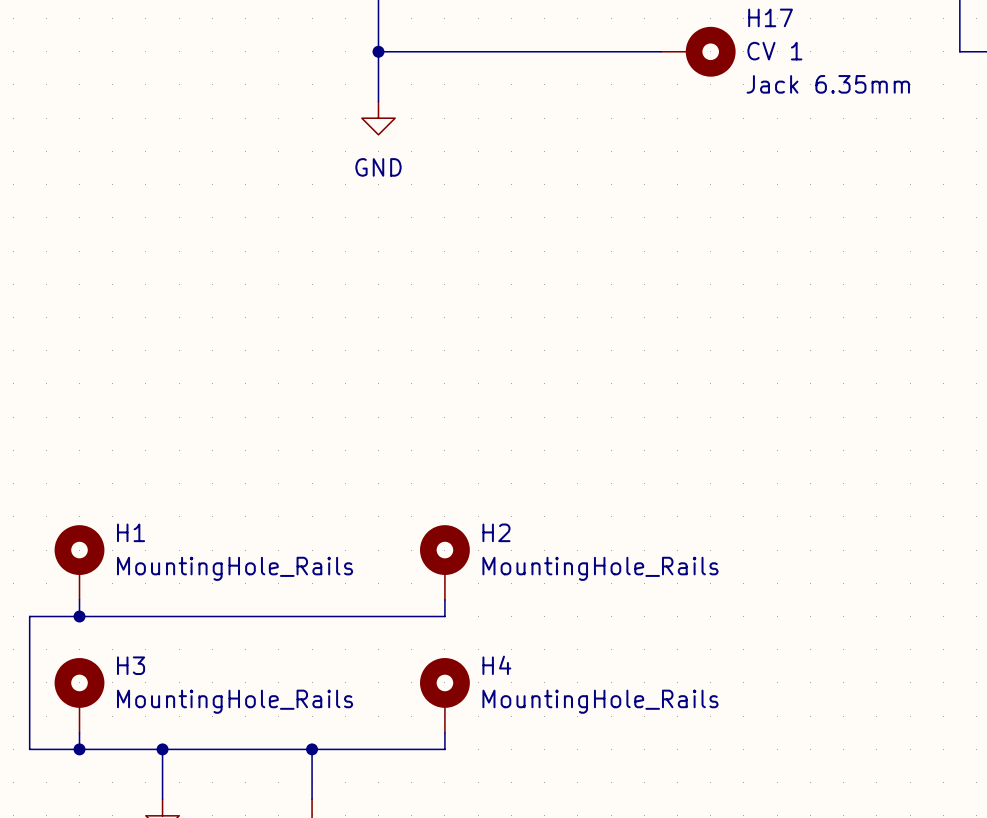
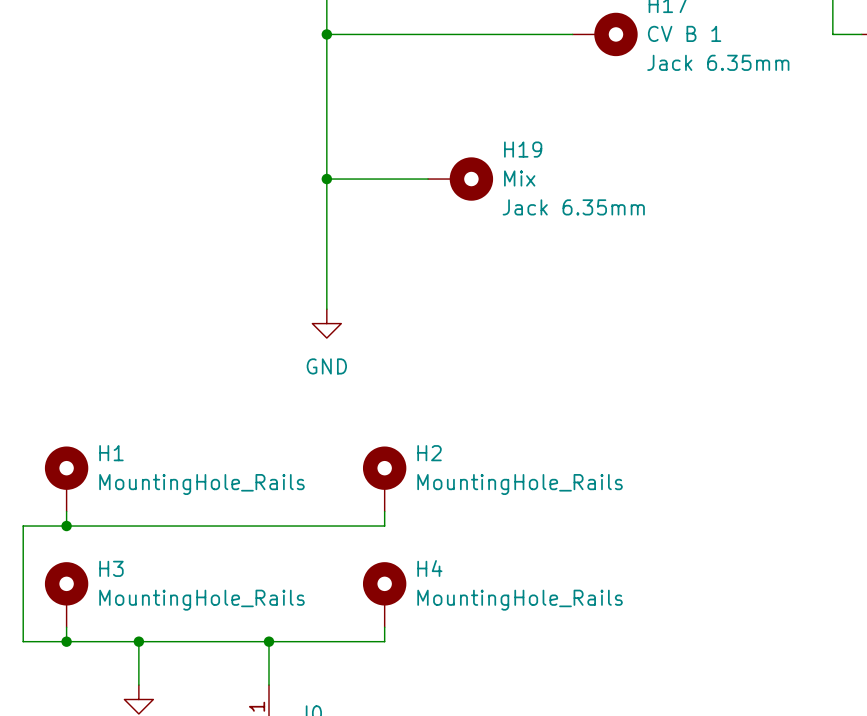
H17 value: CV 1 (774, 51) -> CV B 1 (684, 33)
wire: none -> (326, 77) (326, 309)
power symbol position: GND (378, 118) -> GND (326, 323)
wire: none -> (326, 179) (428, 179)
junction: none -> (326, 179)
H19: none -> Mix (460, 179)

